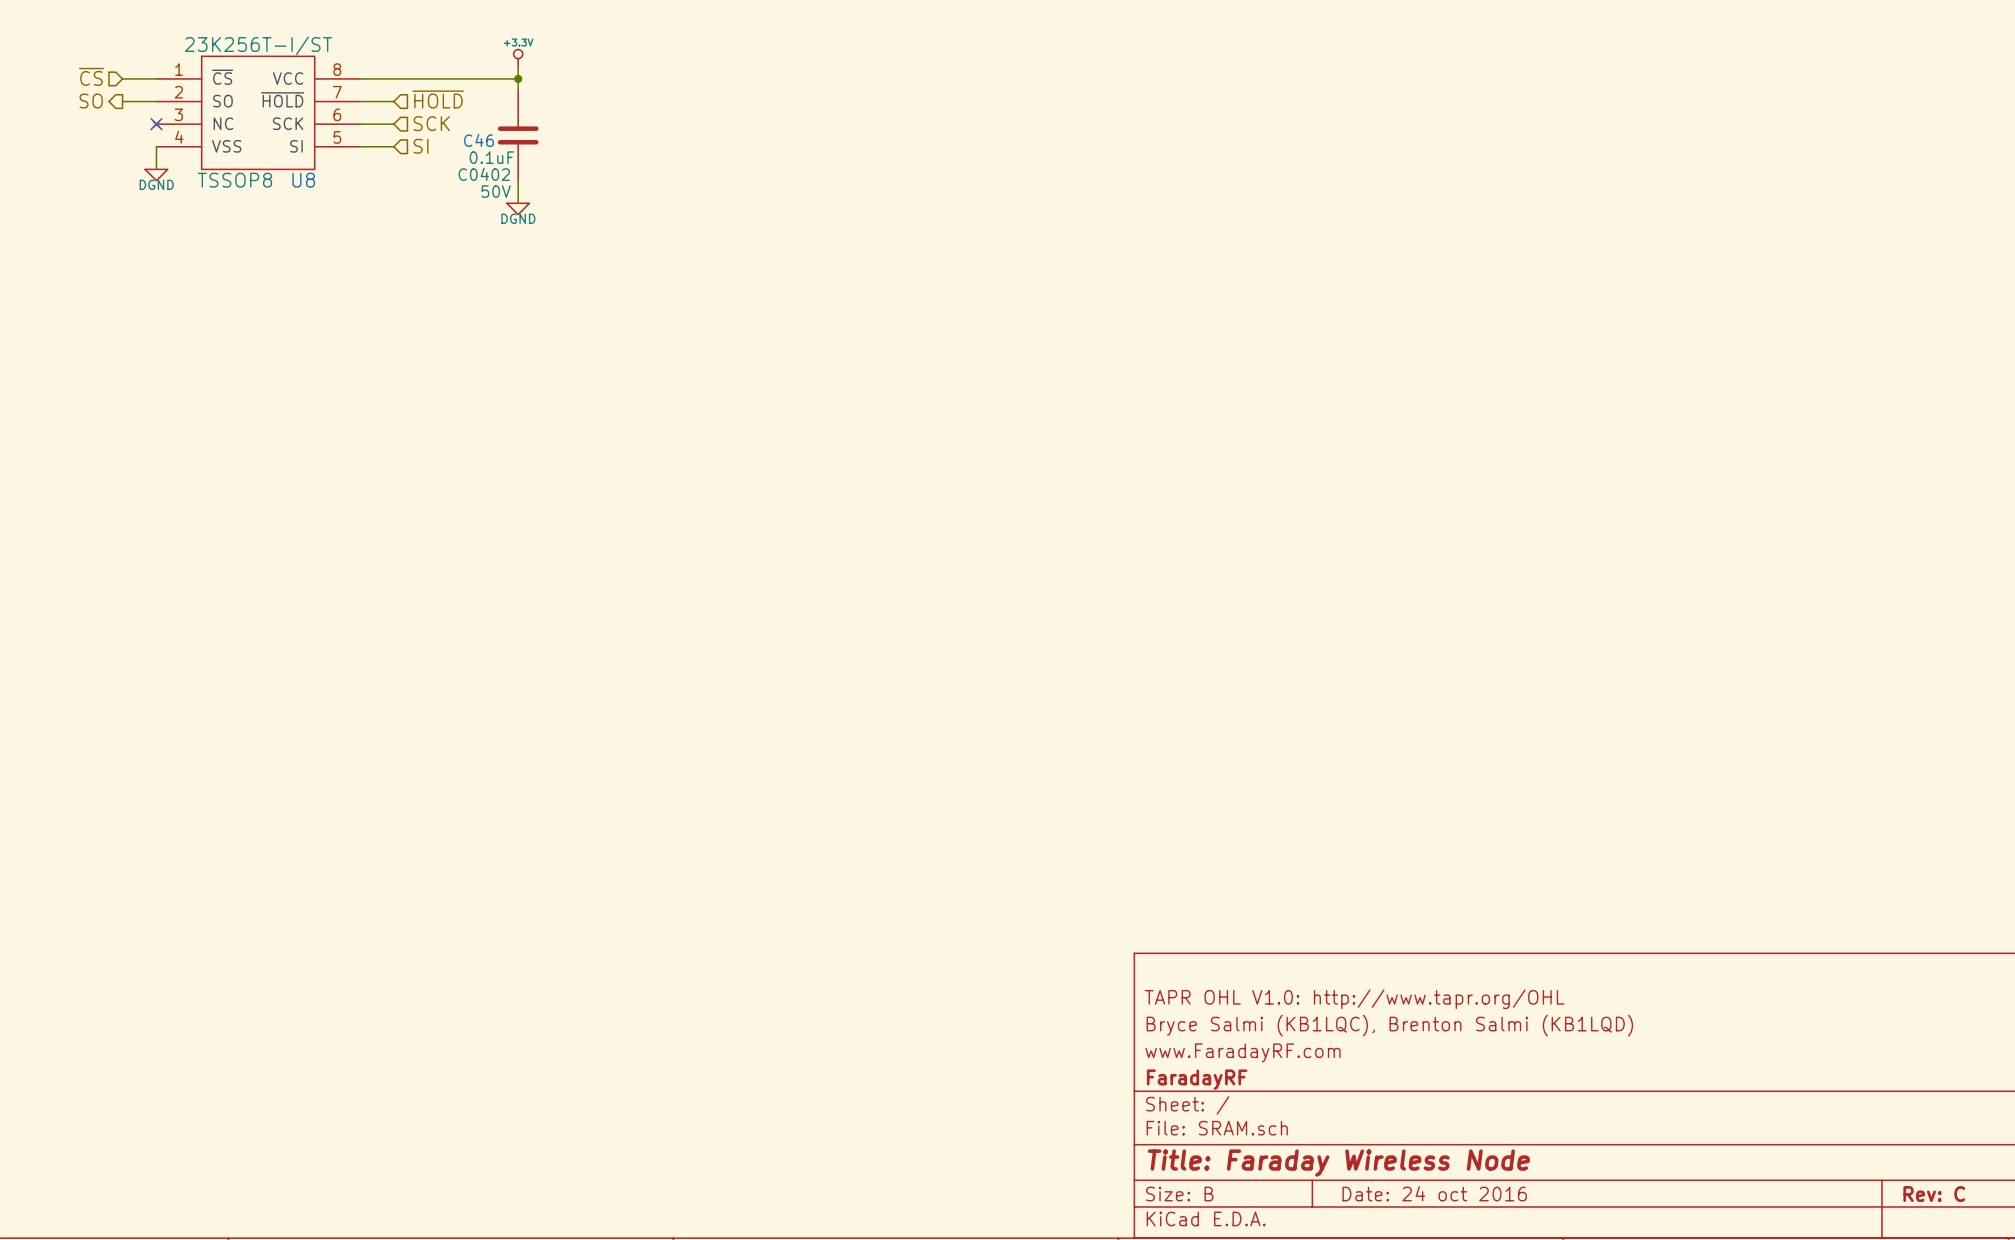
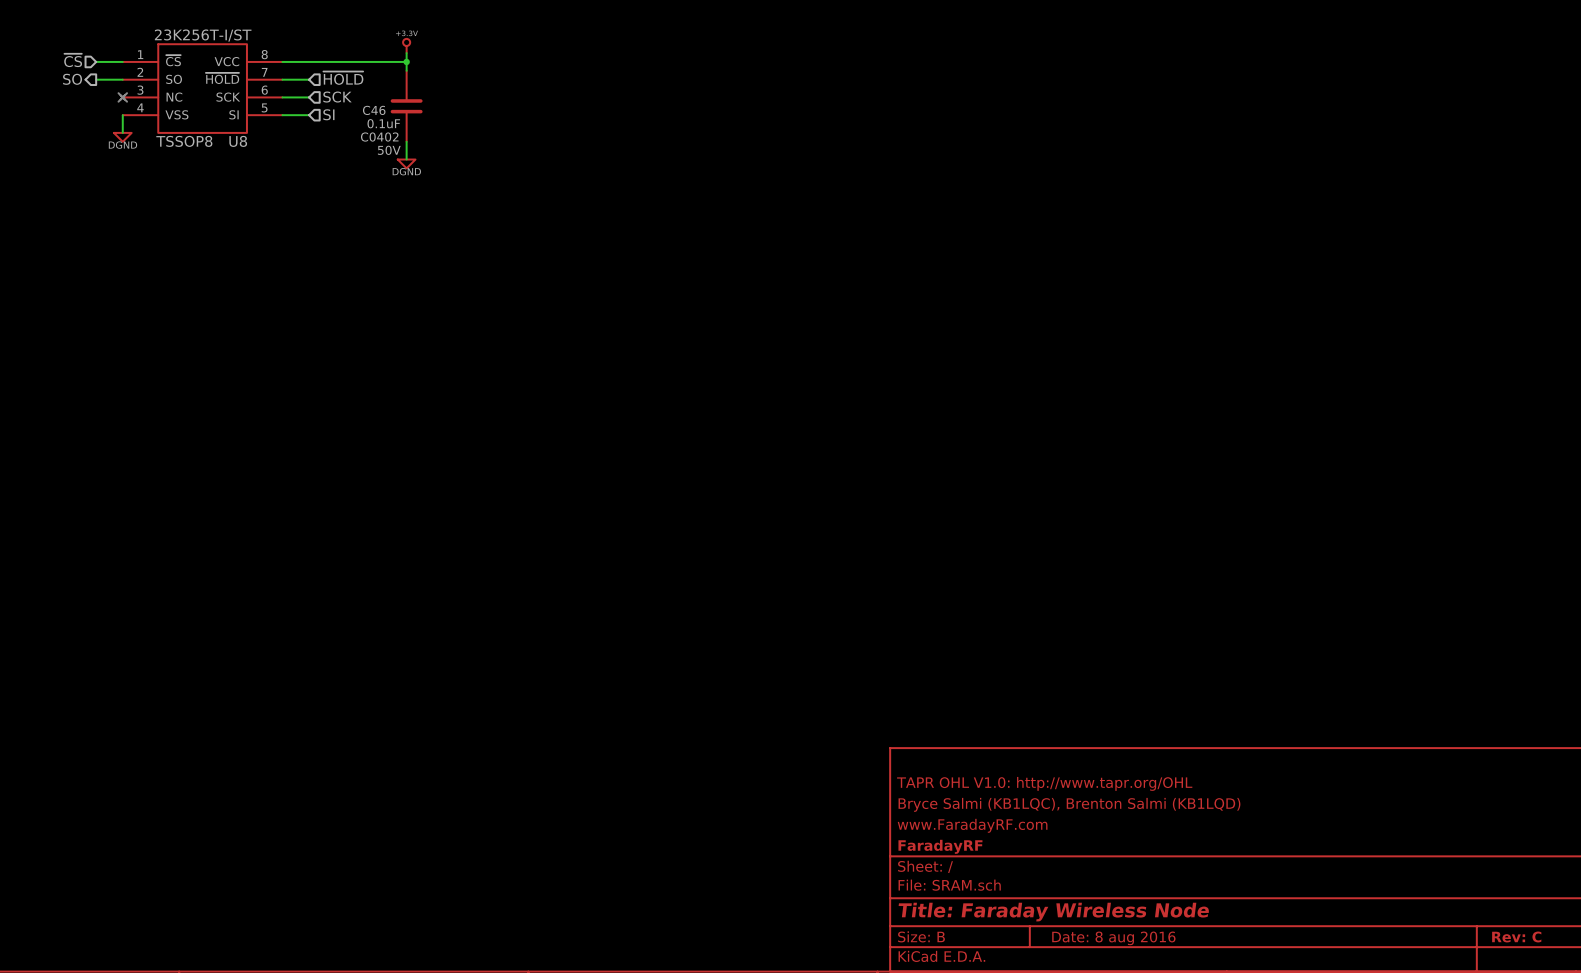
title block: Date: 24 oct 2016 (1434, 1193) -> Date: 8 aug 2016 (1113, 938)

